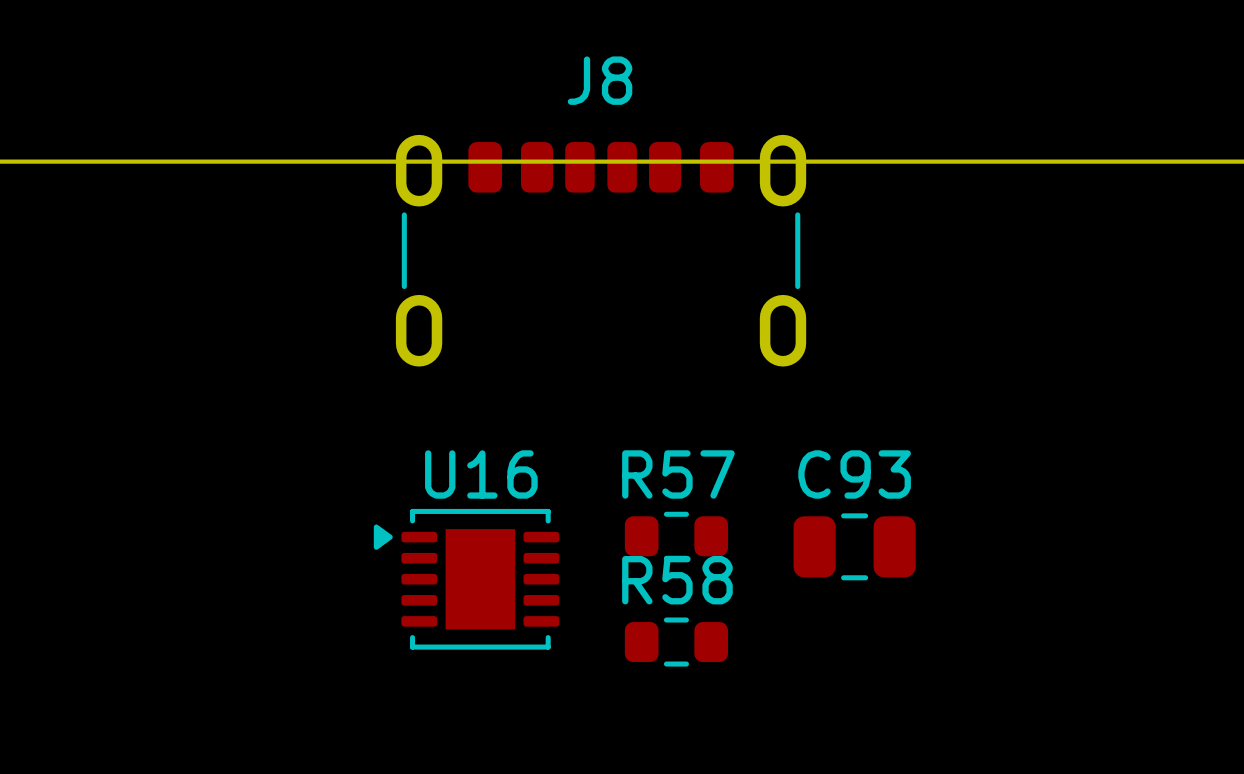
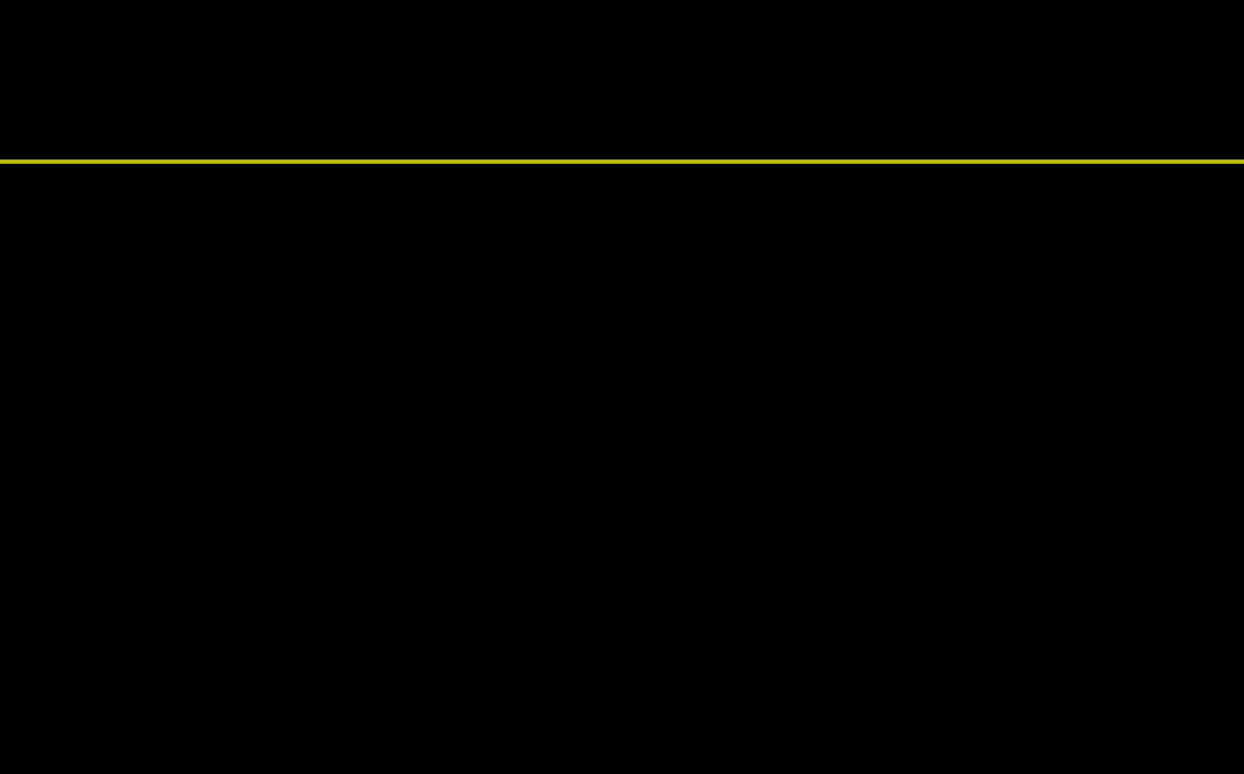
J8: (601, 250) -> none
R57: (676, 536) -> none
C93: (854, 546) -> none
U16: (466, 579) -> none
R58: (676, 642) -> none

